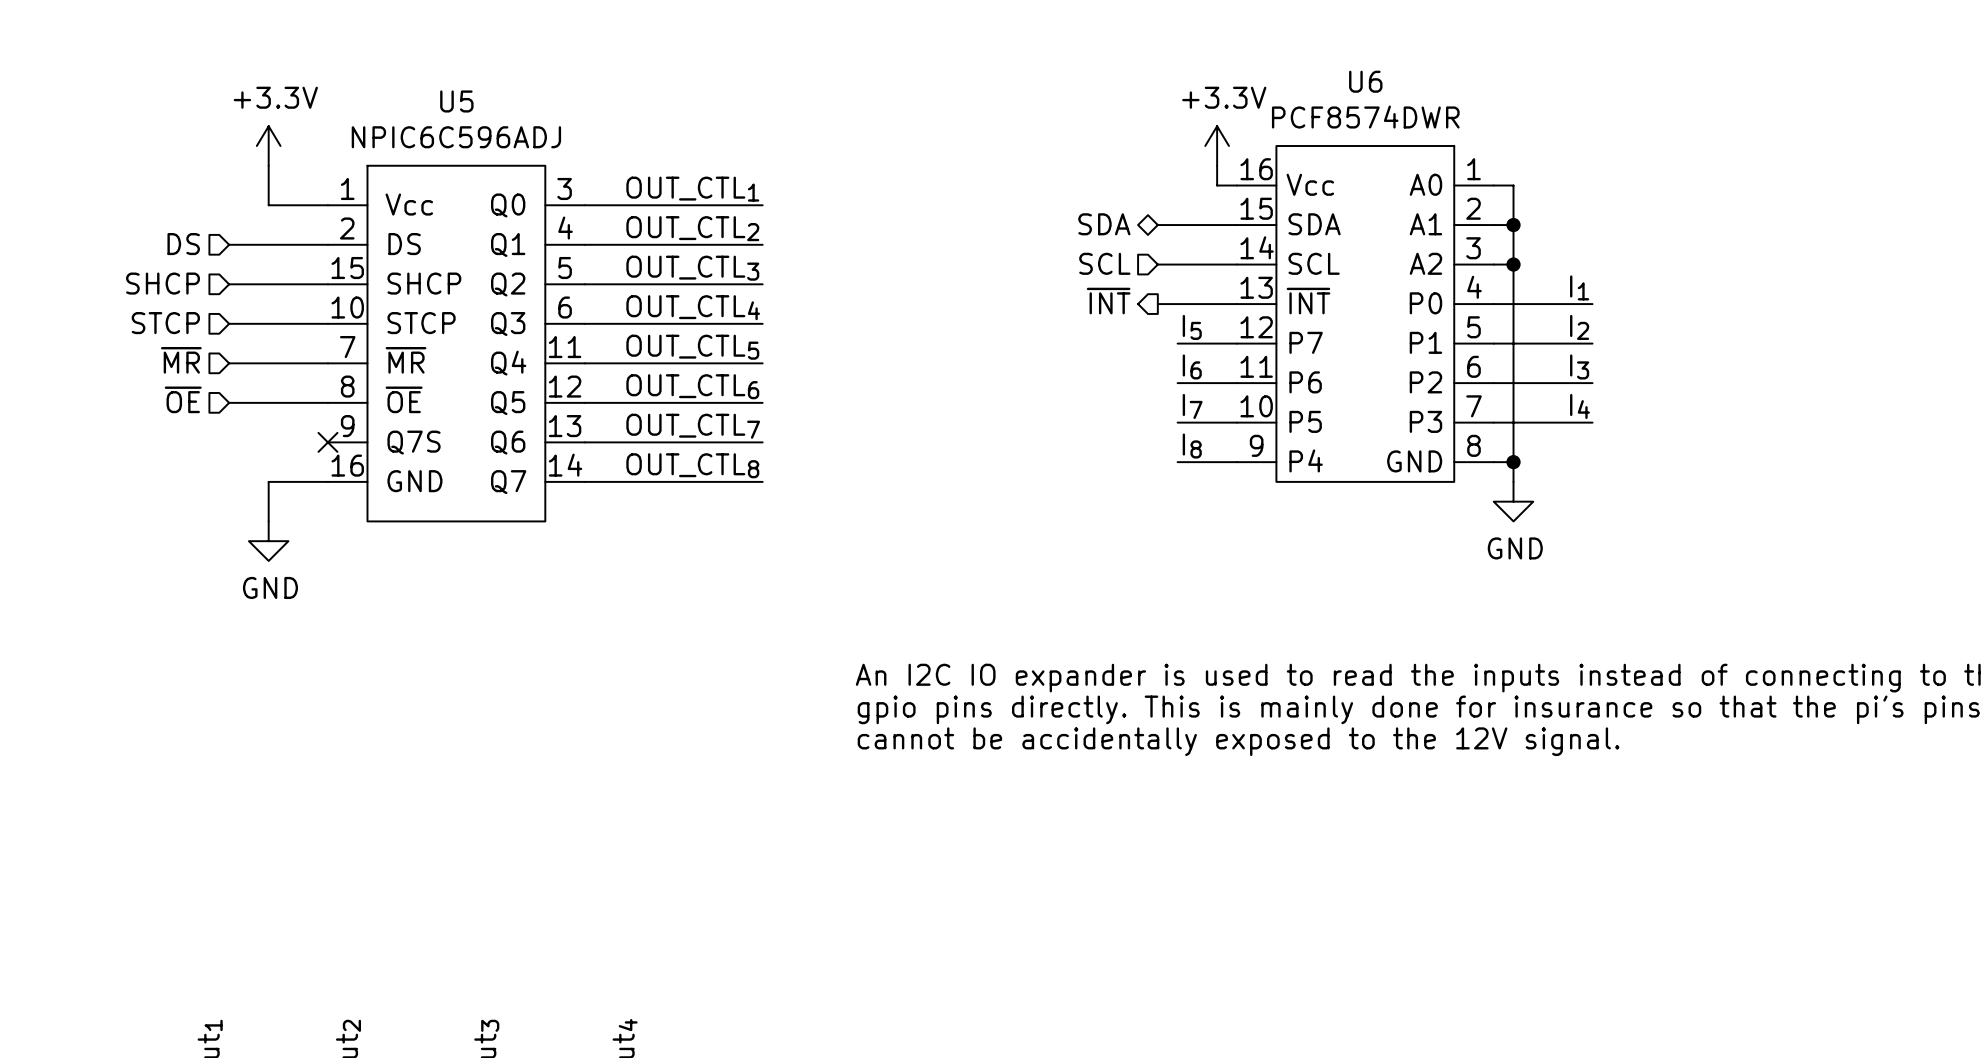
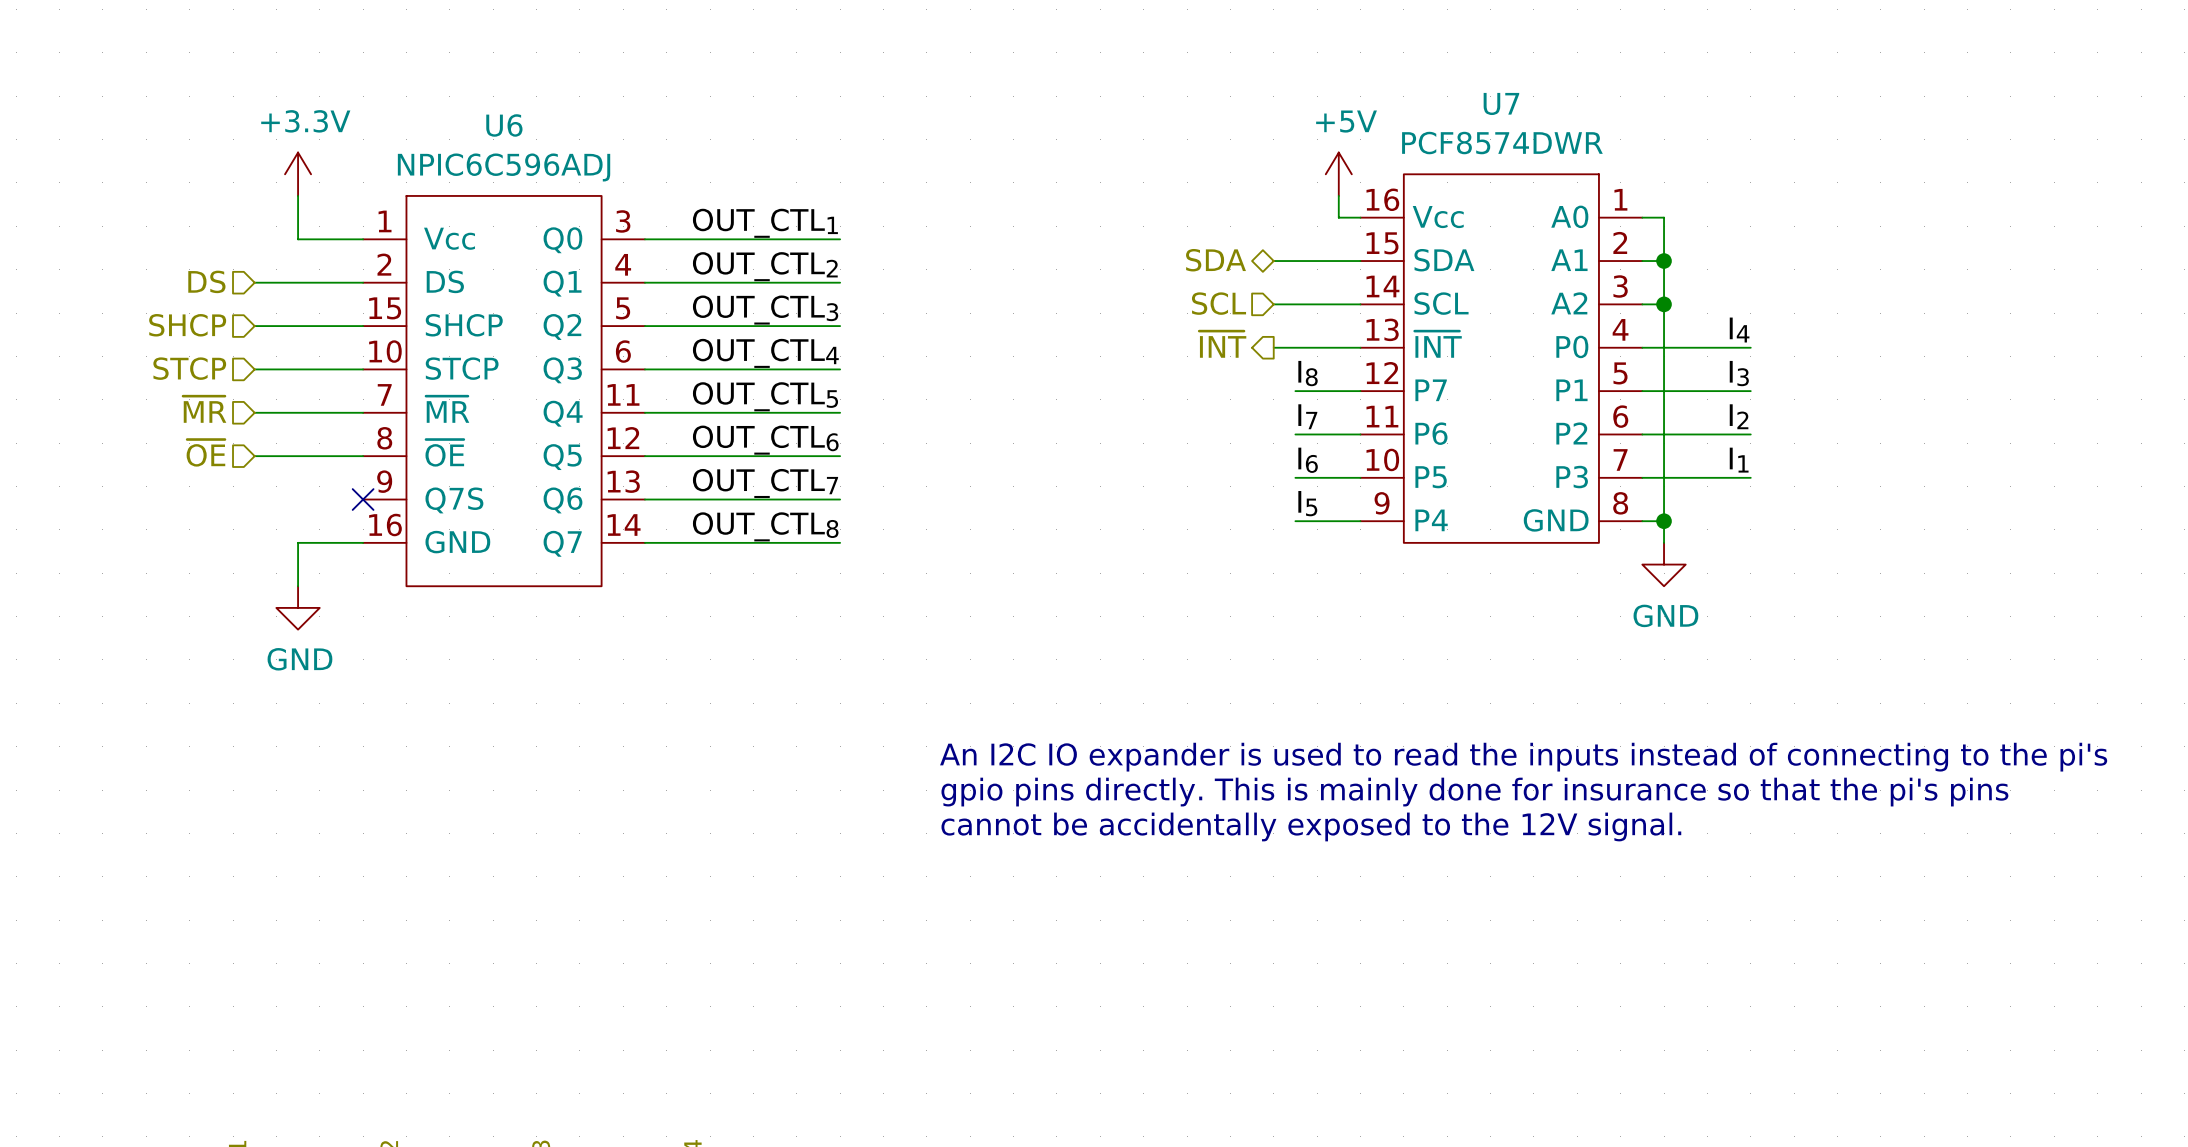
U6 name: U6 (1365, 81) -> U7 (1501, 103)
U5 name: U5 (456, 101) -> U6 (504, 125)
power symbol: +3.3V (1217, 145) -> +5V (1338, 174)
label: I1 (1579, 287) -> I4 (1739, 330)
label: I5 (1192, 327) -> I8 (1308, 373)
label: I2 (1579, 327) -> I3 (1739, 373)
label: I6 (1192, 366) -> I7 (1307, 416)
label: I3 (1579, 366) -> I2 (1739, 416)
label: I7 (1192, 406) -> I6 (1308, 460)
label: I4 (1579, 406) -> I1 (1739, 460)
label: I8 (1192, 445) -> I5 (1307, 503)

